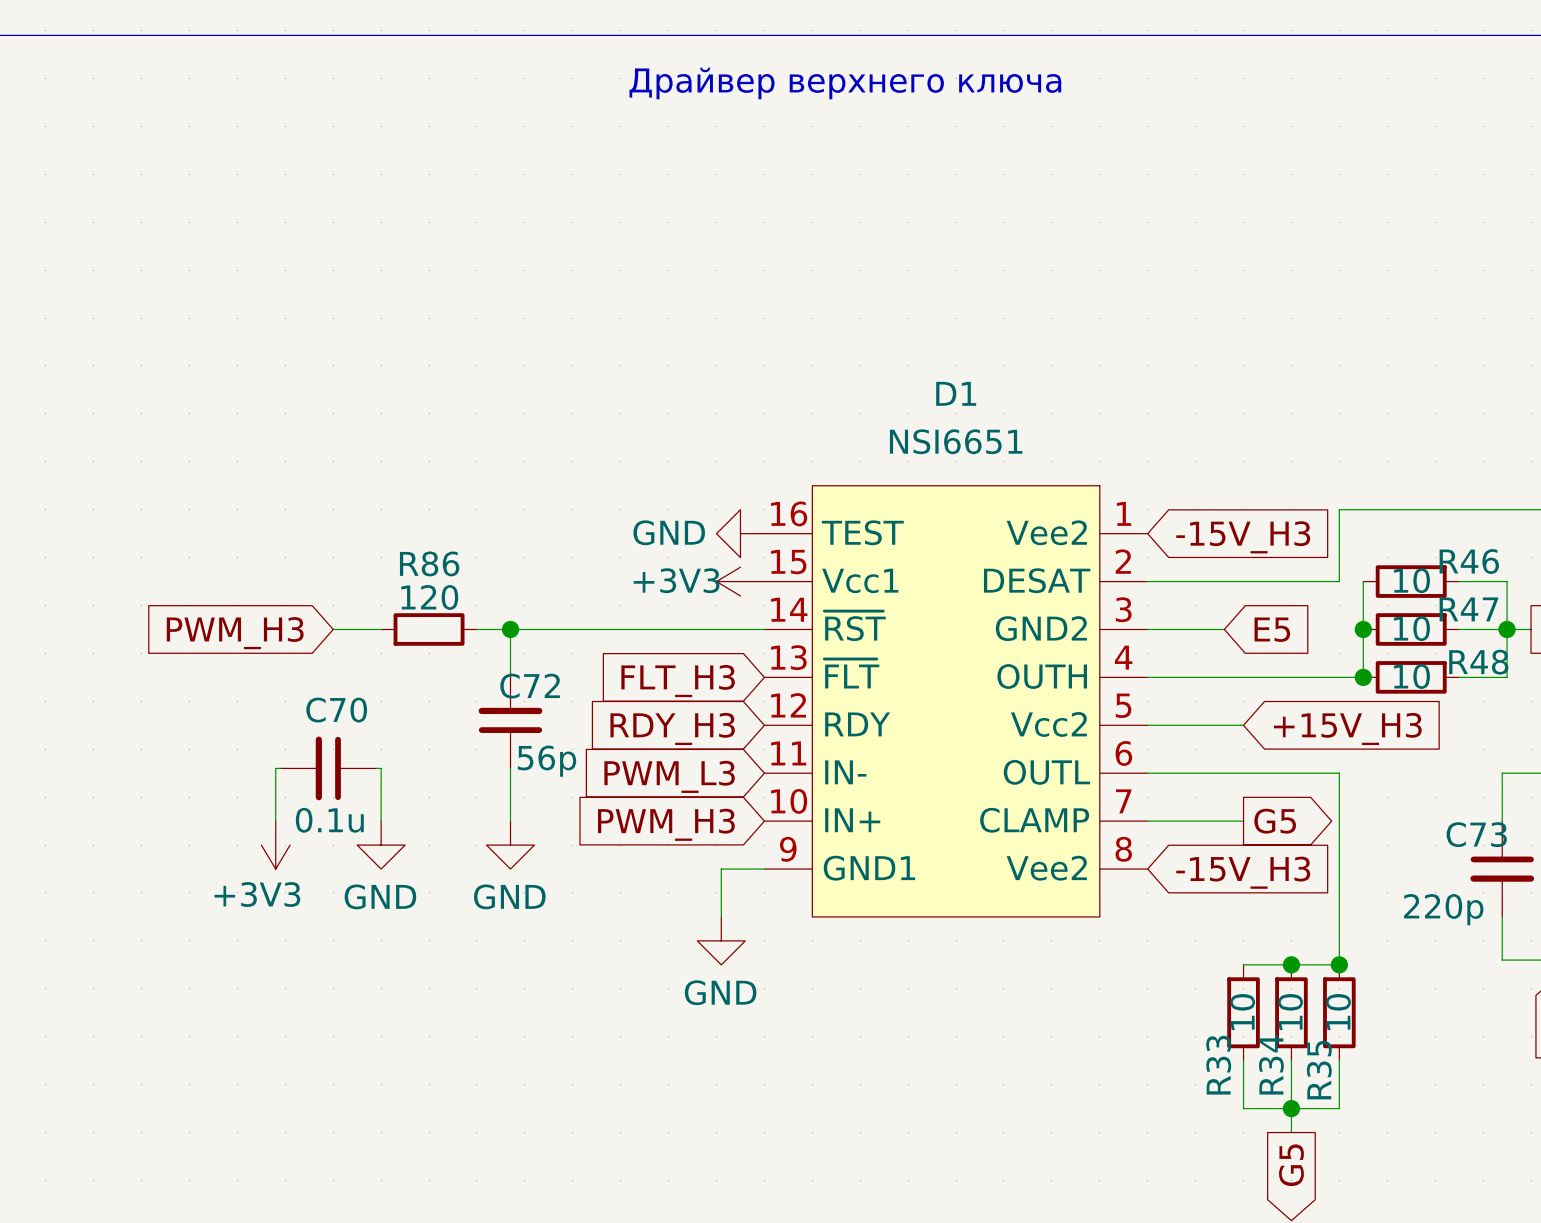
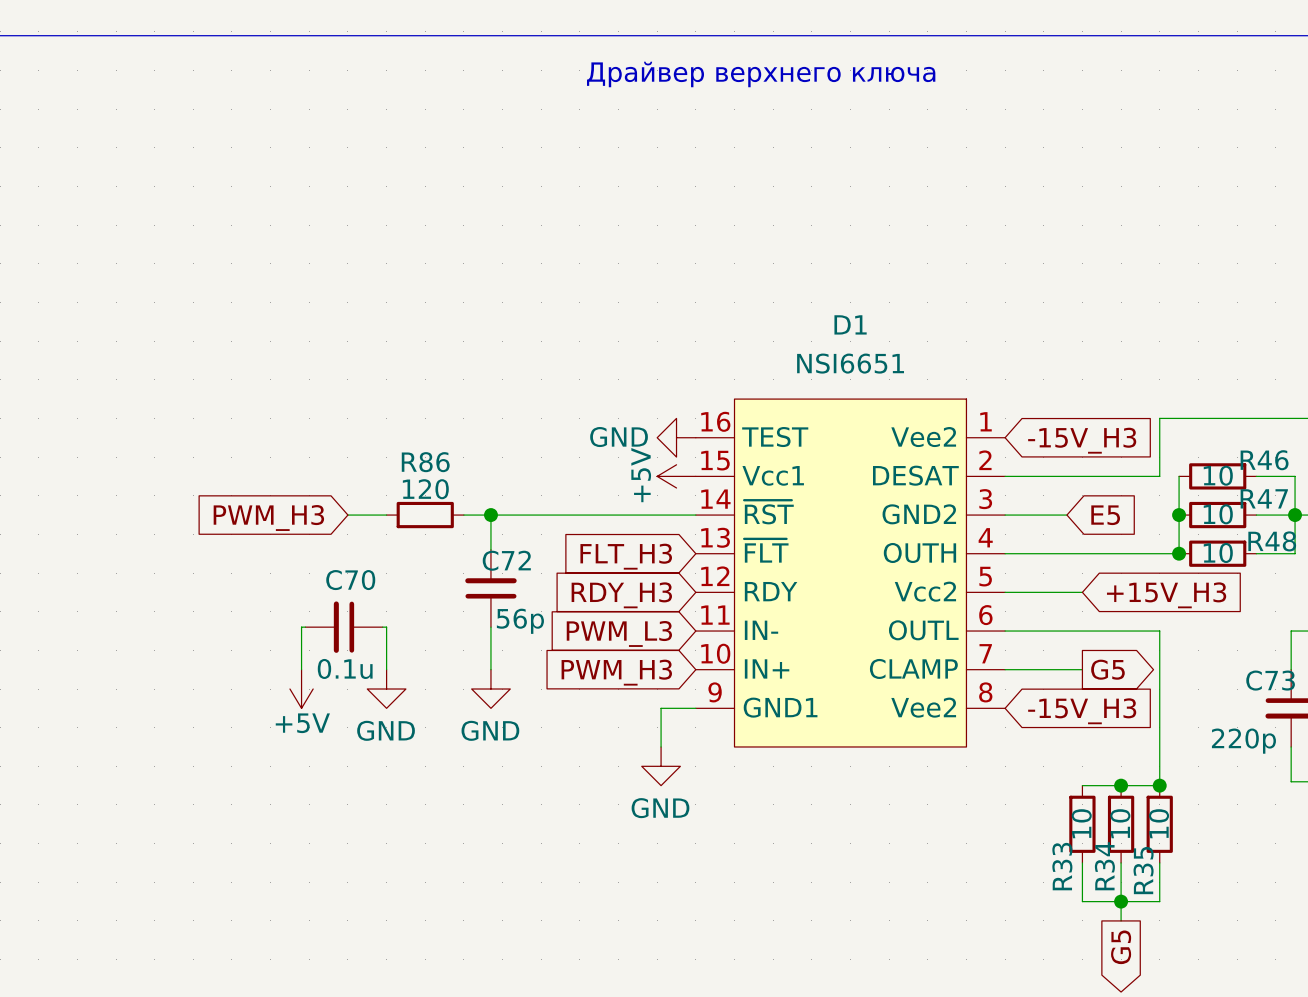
power symbol: +3V3 (740, 581) -> +5V (676, 476)
power symbol: +3V3 (275, 845) -> +5V (301, 689)

